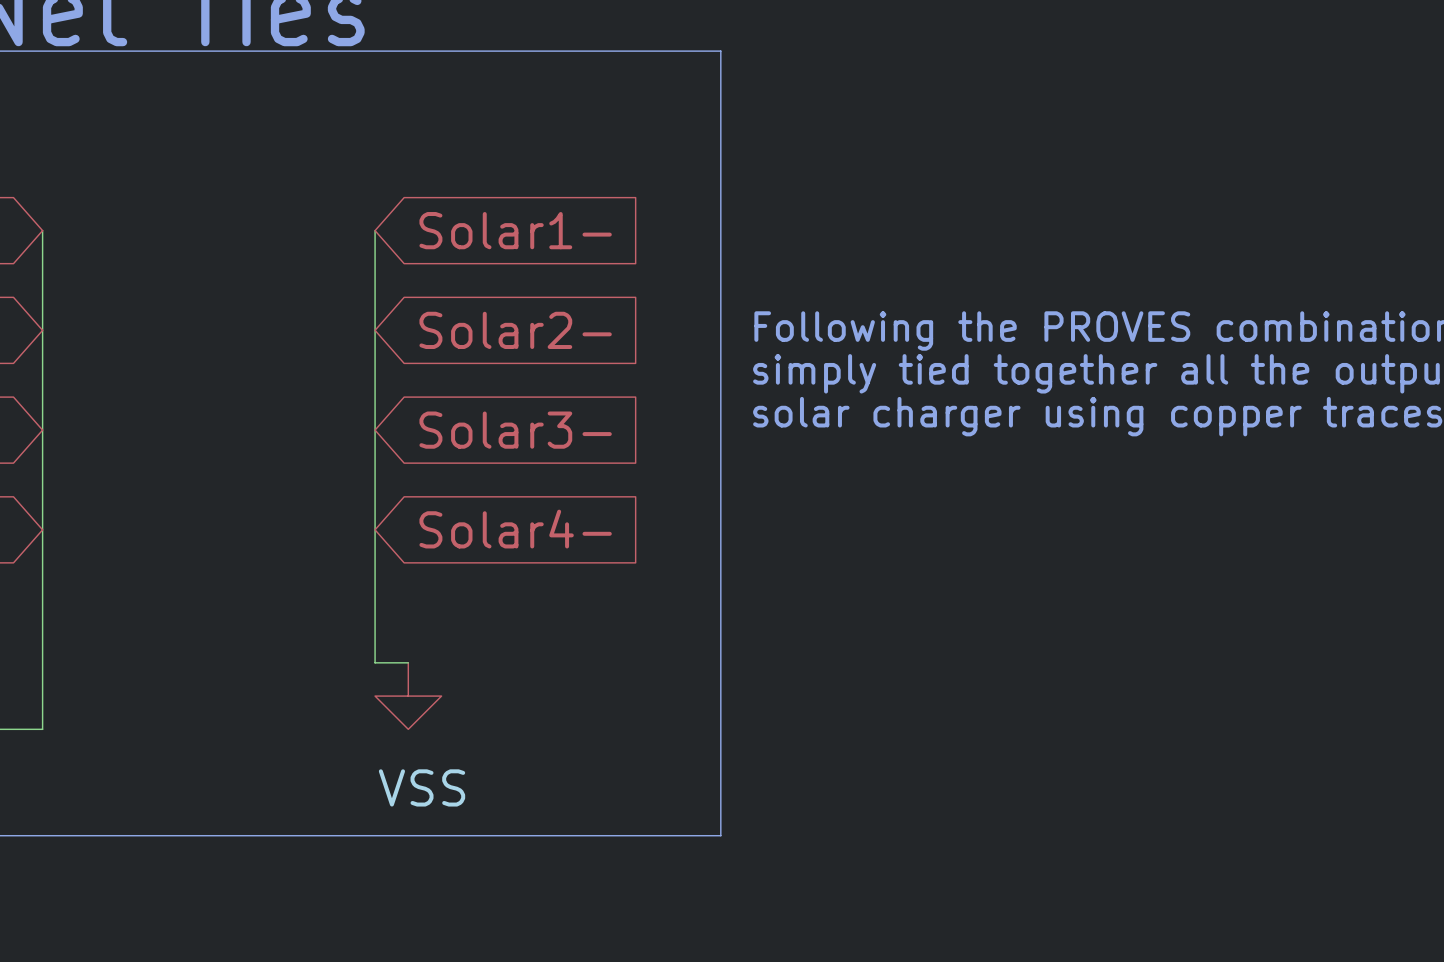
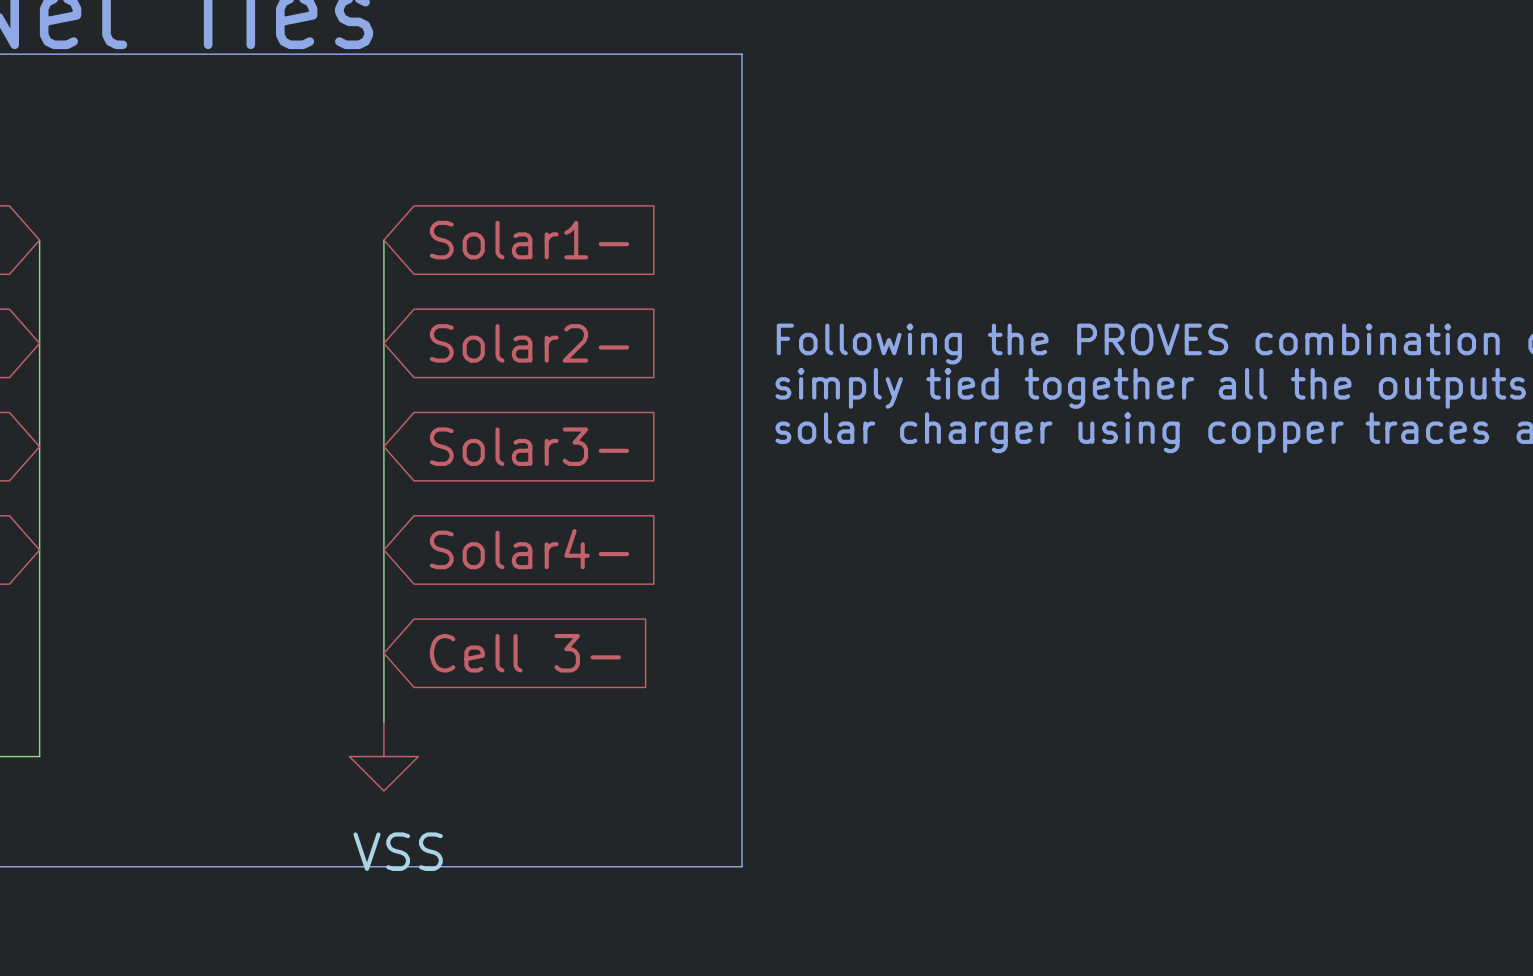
global label: none -> Cell 3- (525, 653)
wire: (375, 662) (408, 662) -> (383, 687) (383, 722)
power symbol position: VSS (408, 696) -> VSS (383, 756)

